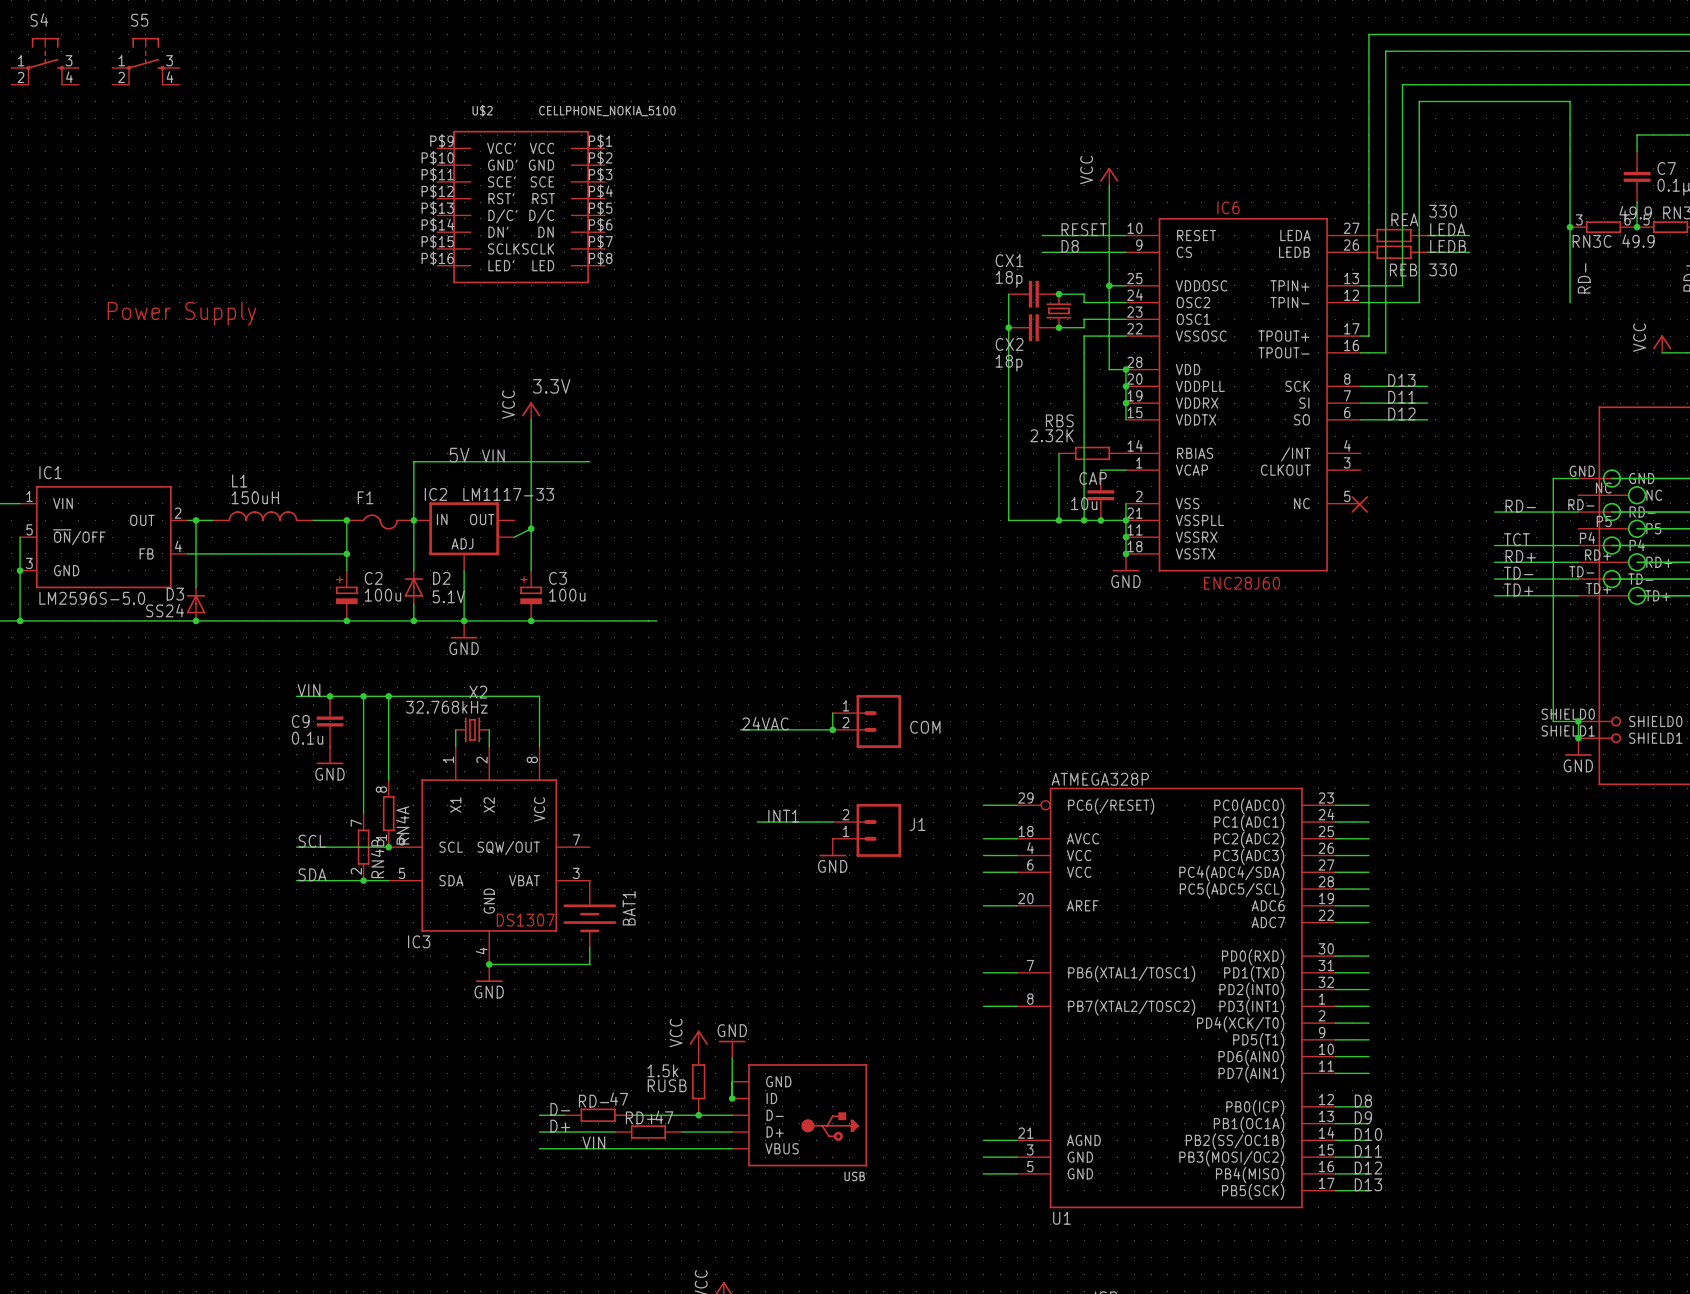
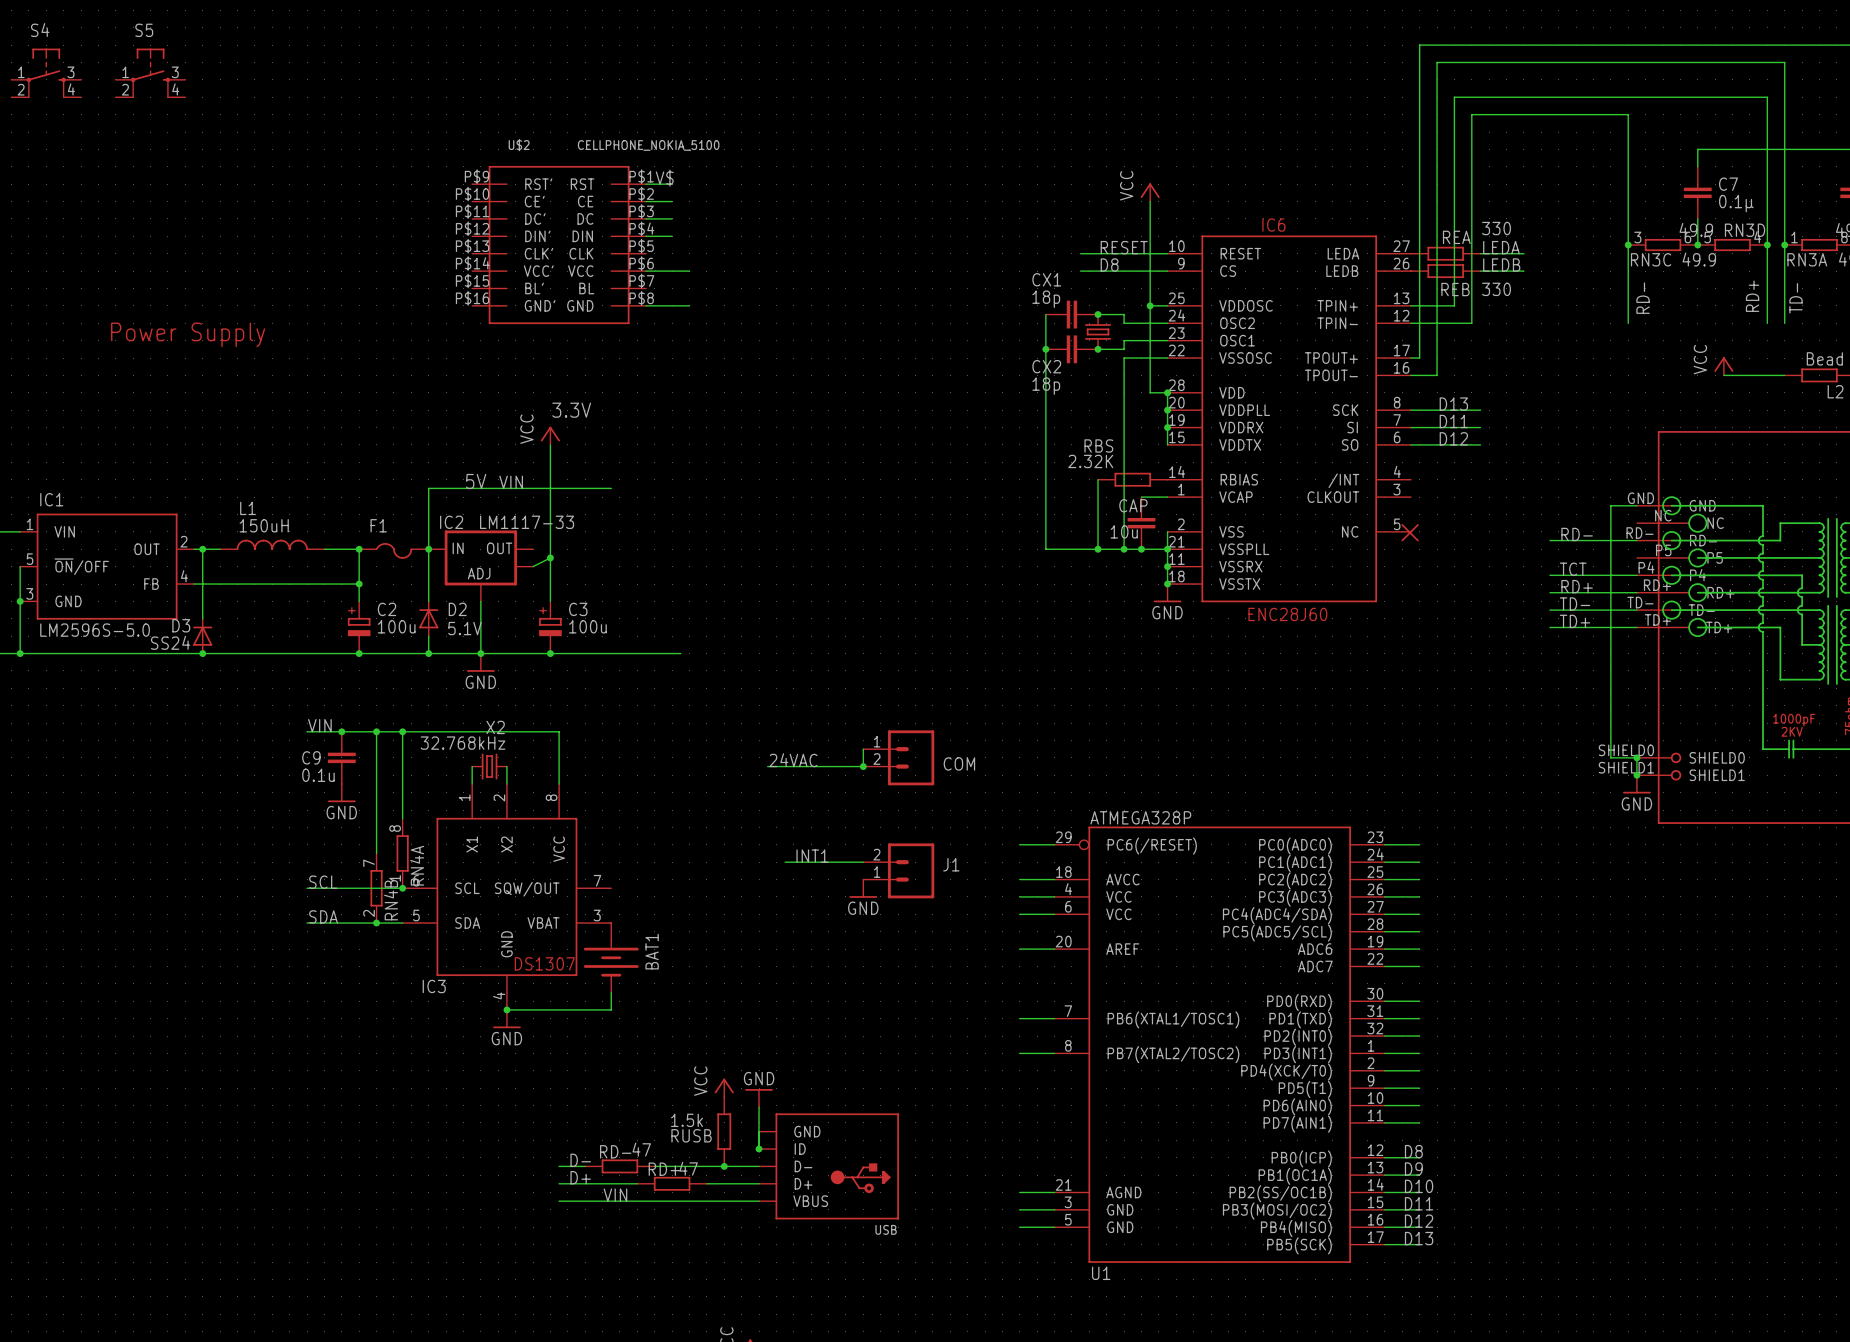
U$2 symbol: [437, 130, 605, 284] -> [472, 165, 647, 325]
label: none -> V$ (664, 178)
wire: none -> (646, 184) (672, 184)
wire: none -> (646, 201) (672, 201)
wire: none -> (646, 218) (672, 218)
wire: none -> (646, 236) (672, 236)
wire: none -> (646, 271) (689, 271)
wire: none -> (646, 305) (689, 305)

